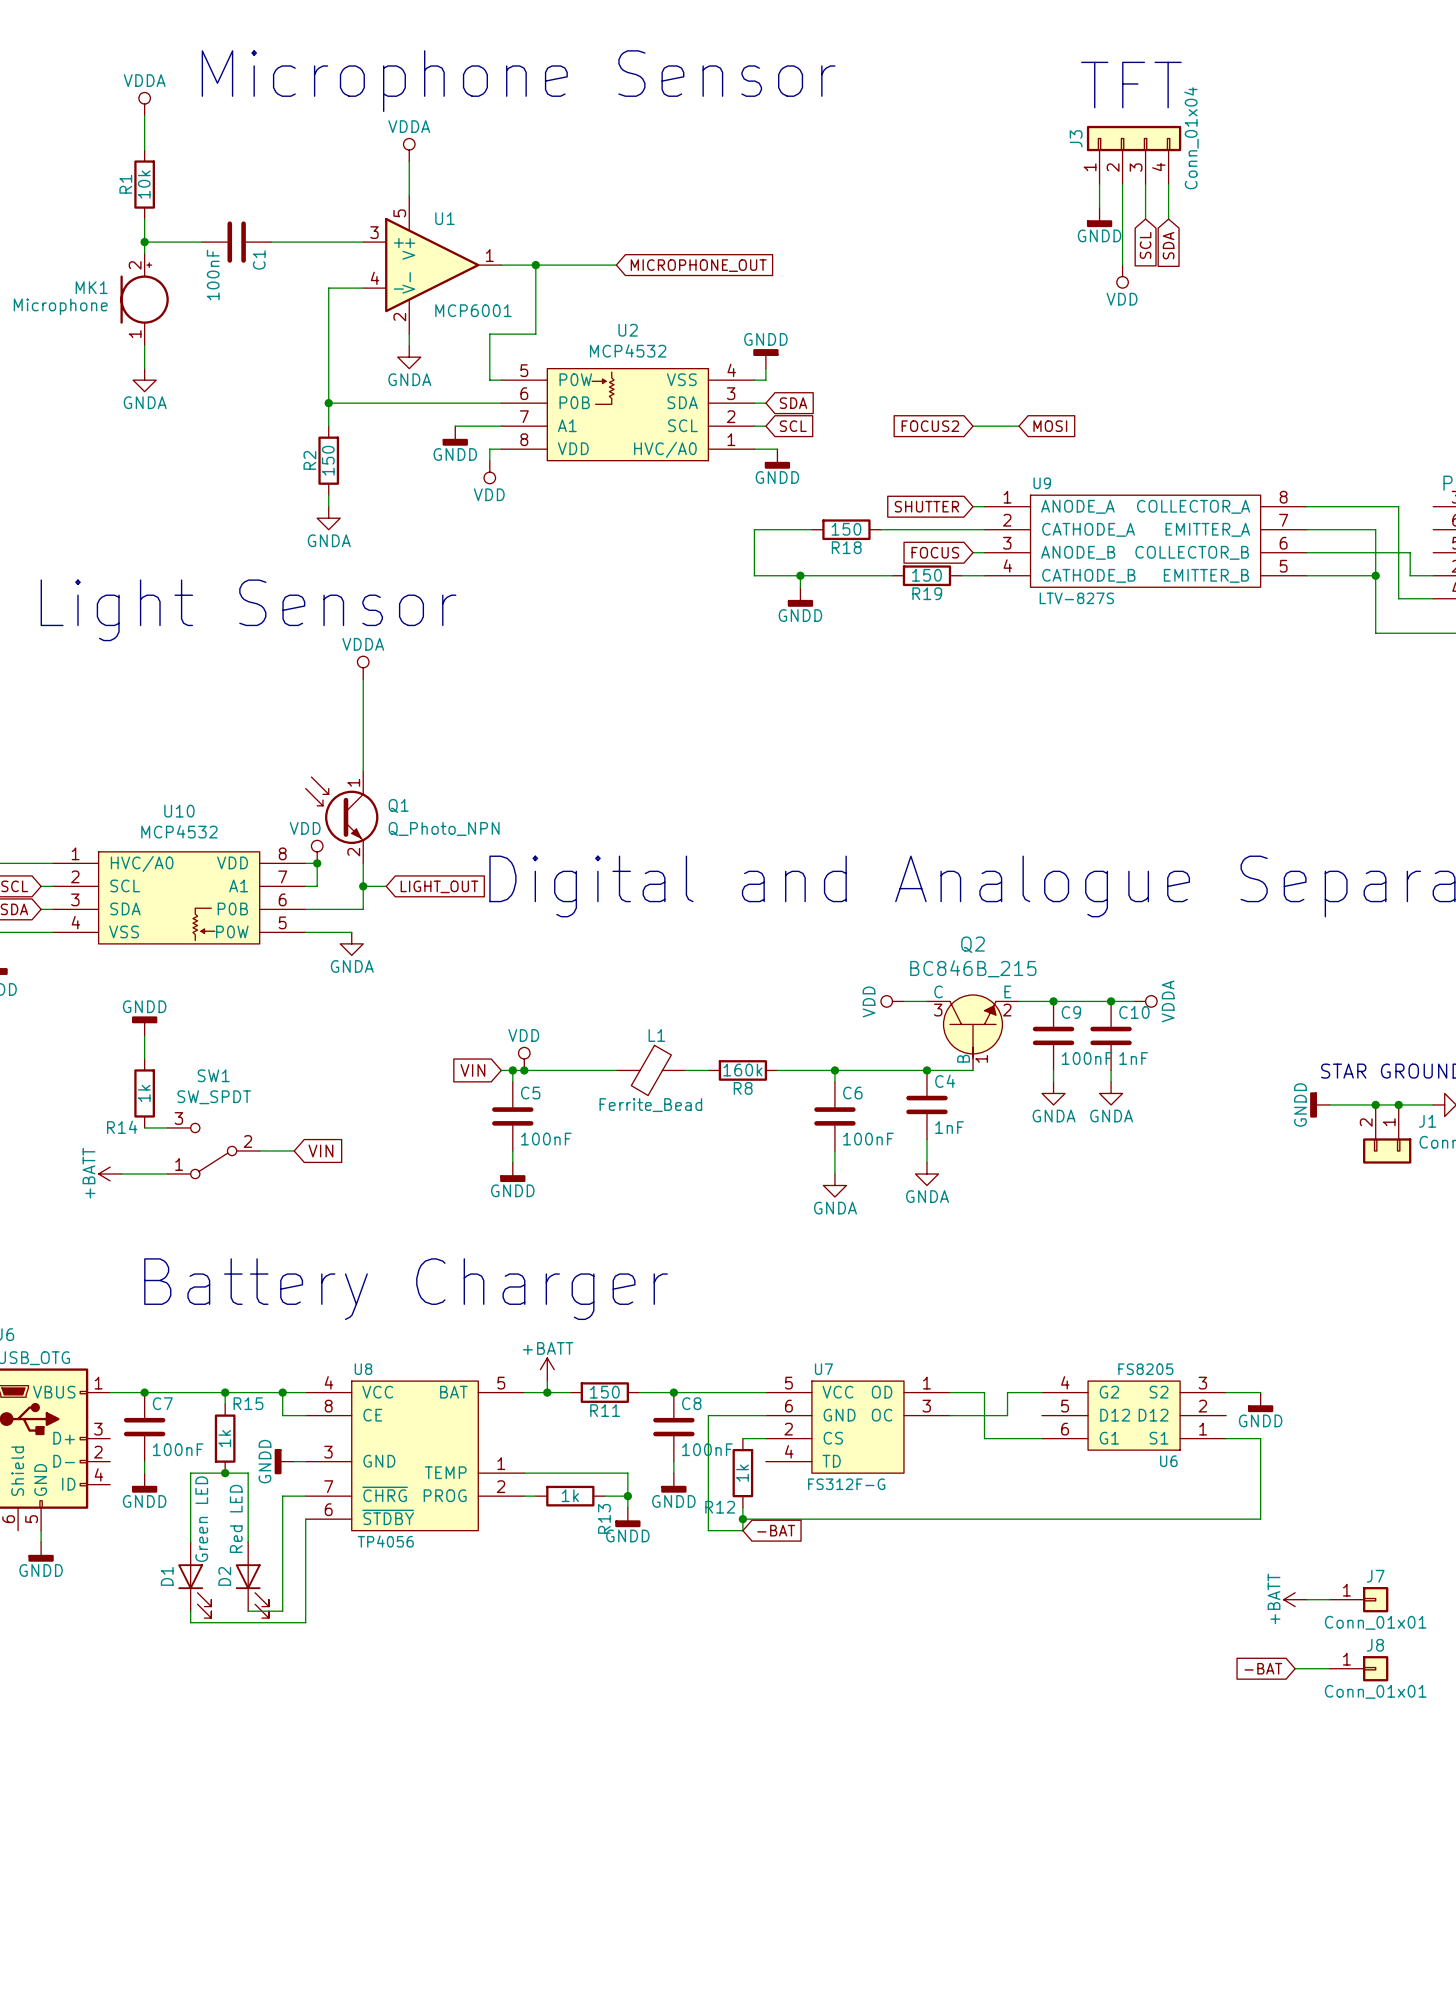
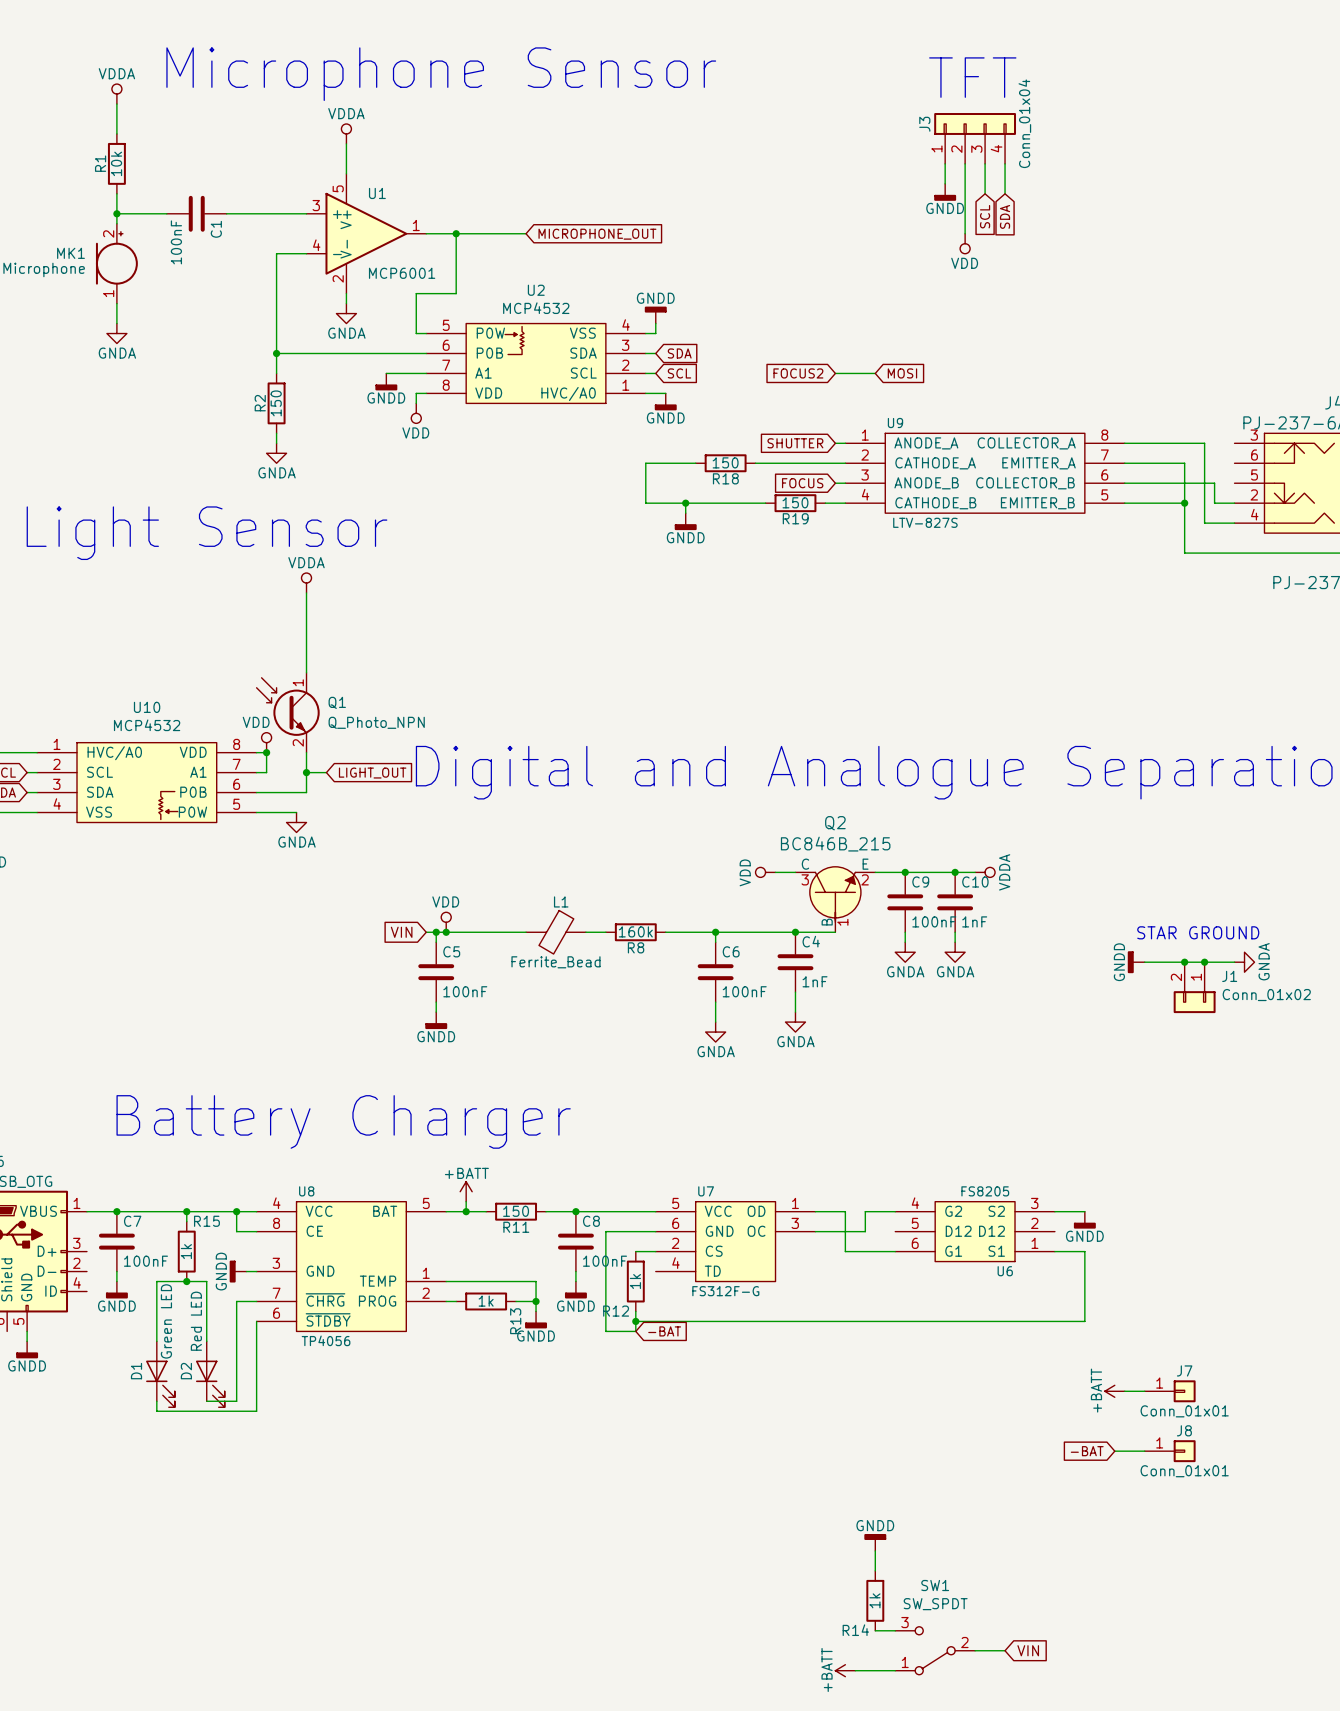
power symbol: GNDD (144, 1026) -> none
wire: (144, 1035) (144, 1058) -> none
R14 position: (144, 1093) -> (875, 1600)
wire: (144, 1127) (167, 1127) -> none
SW1 position: (213, 1150) -> (935, 1650)
wire: (259, 1150) (294, 1150) -> none
global label: VIN (320, 1150) -> none
power symbol: +BATT (110, 1174) -> none
wire: (121, 1174) (167, 1174) -> none
power symbol: none -> GNDD (875, 1542)
wire: none -> (875, 1550) (875, 1570)
wire: none -> (875, 1630) (895, 1630)
wire: none -> (975, 1650) (1005, 1650)
global label: none -> VIN (1028, 1650)
power symbol: none -> +BATT (845, 1670)
wire: none -> (855, 1670) (895, 1670)

